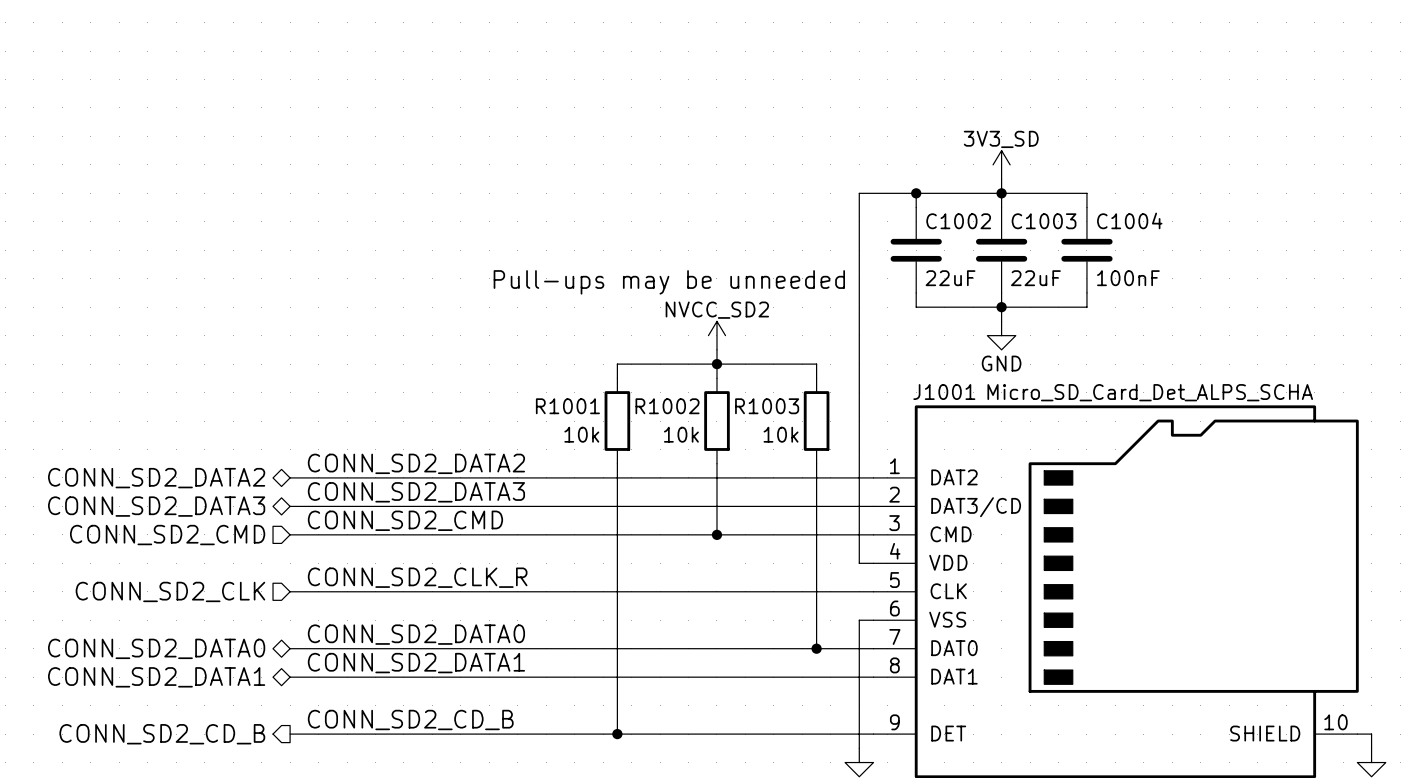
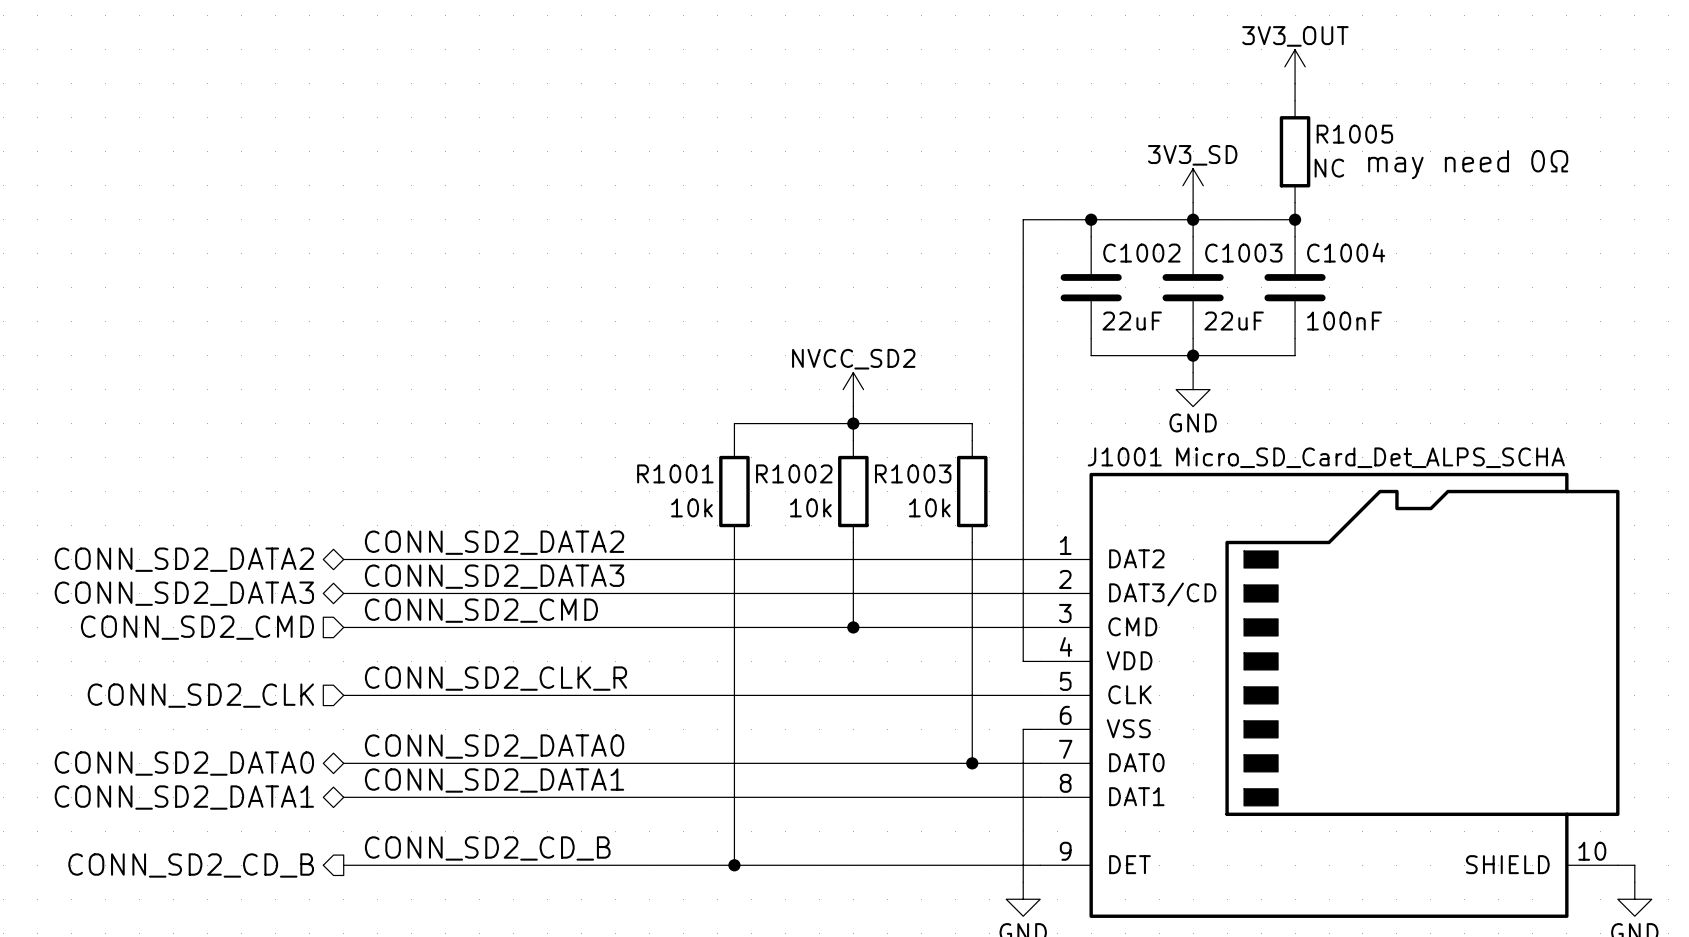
power symbol: none -> 3V3_OUT (1295, 66)
wire: none -> (1295, 83) (1295, 100)
R1005: none -> NC (1295, 151)
text: none -> may need 0Ω (1468, 164)
wire: none -> (1295, 202) (1295, 219)
junction: none -> (1295, 219)
text: Pull-ups may be unneeded (669, 282) -> none

